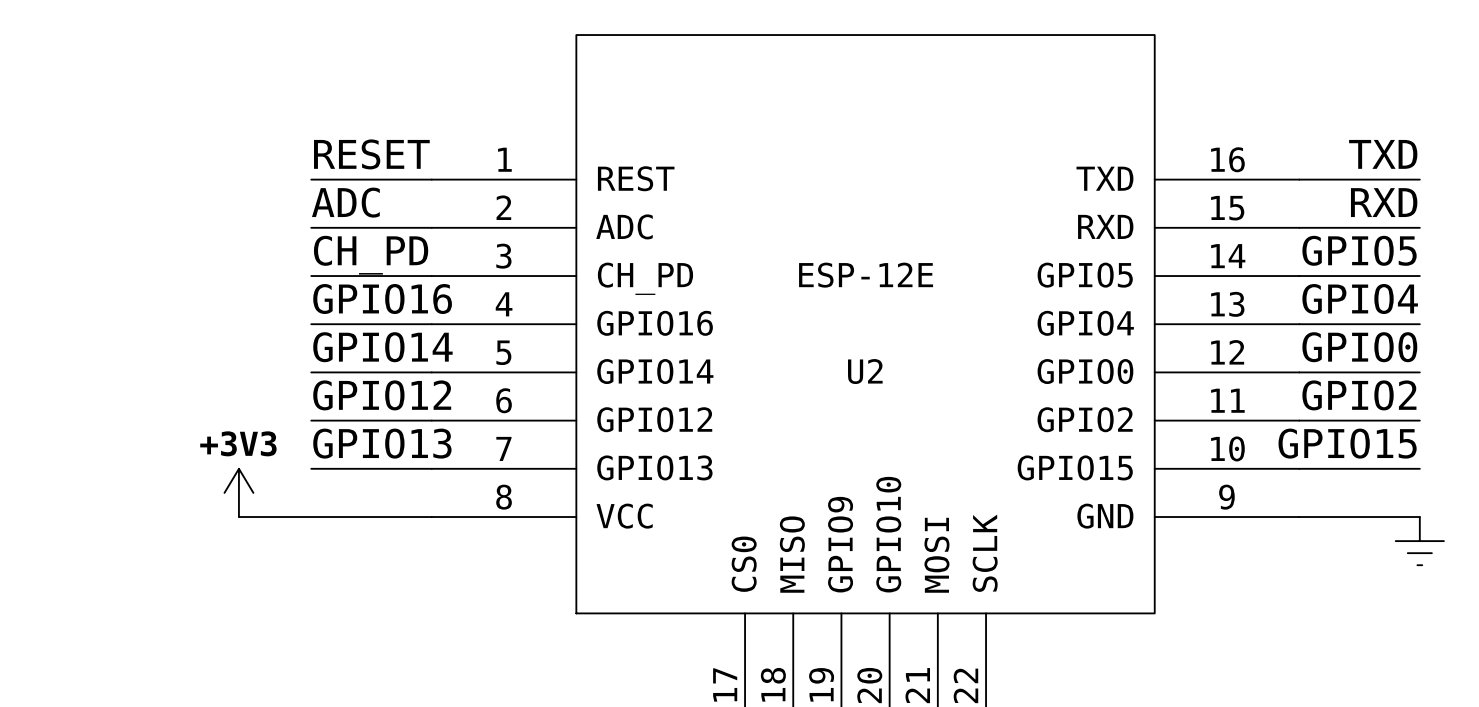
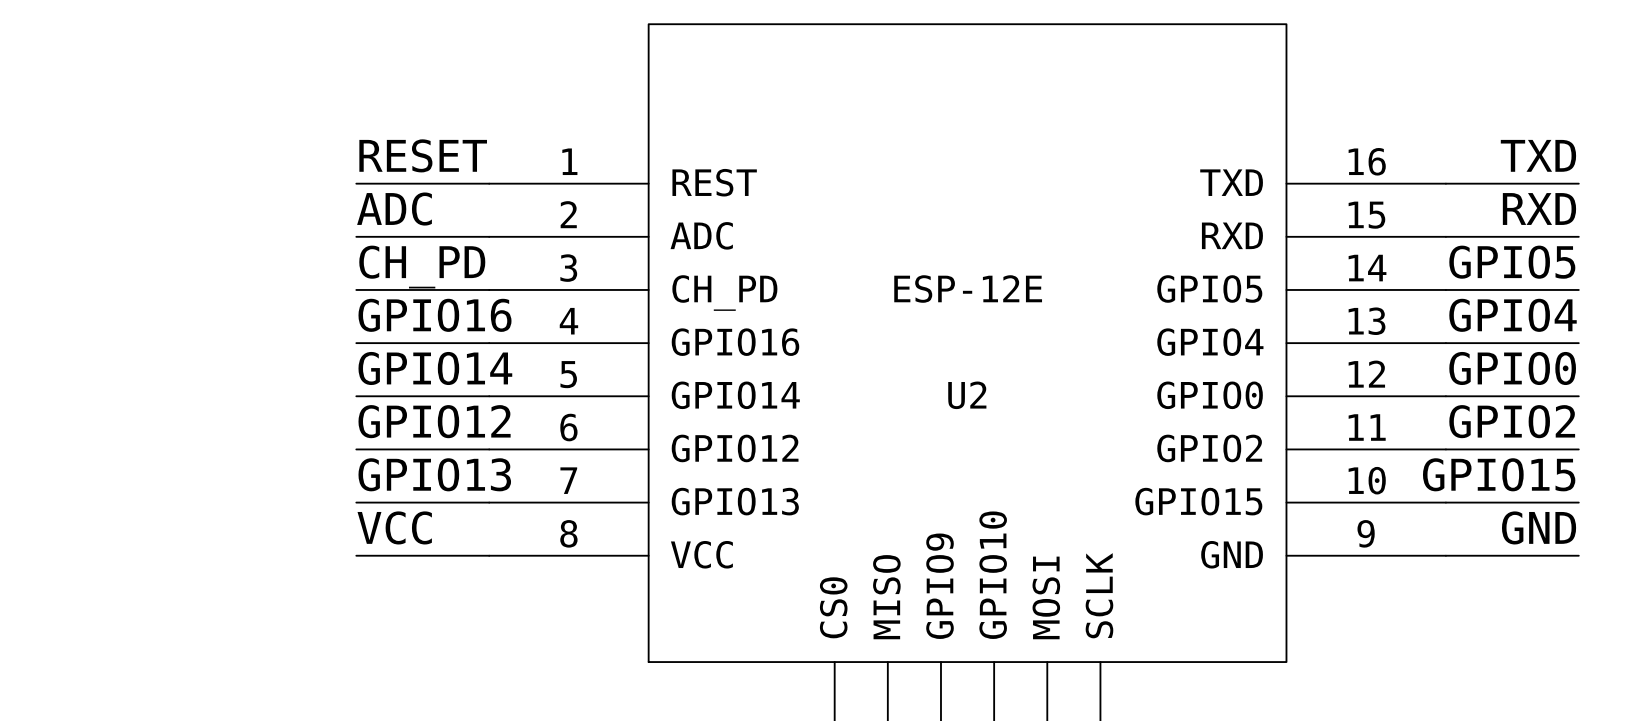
label: none -> VCC (394, 527)
label: none -> GND (1539, 527)
power symbol: (238, 492) -> none
wire: (238, 517) (311, 517) -> none
power symbol: (1419, 541) -> none

